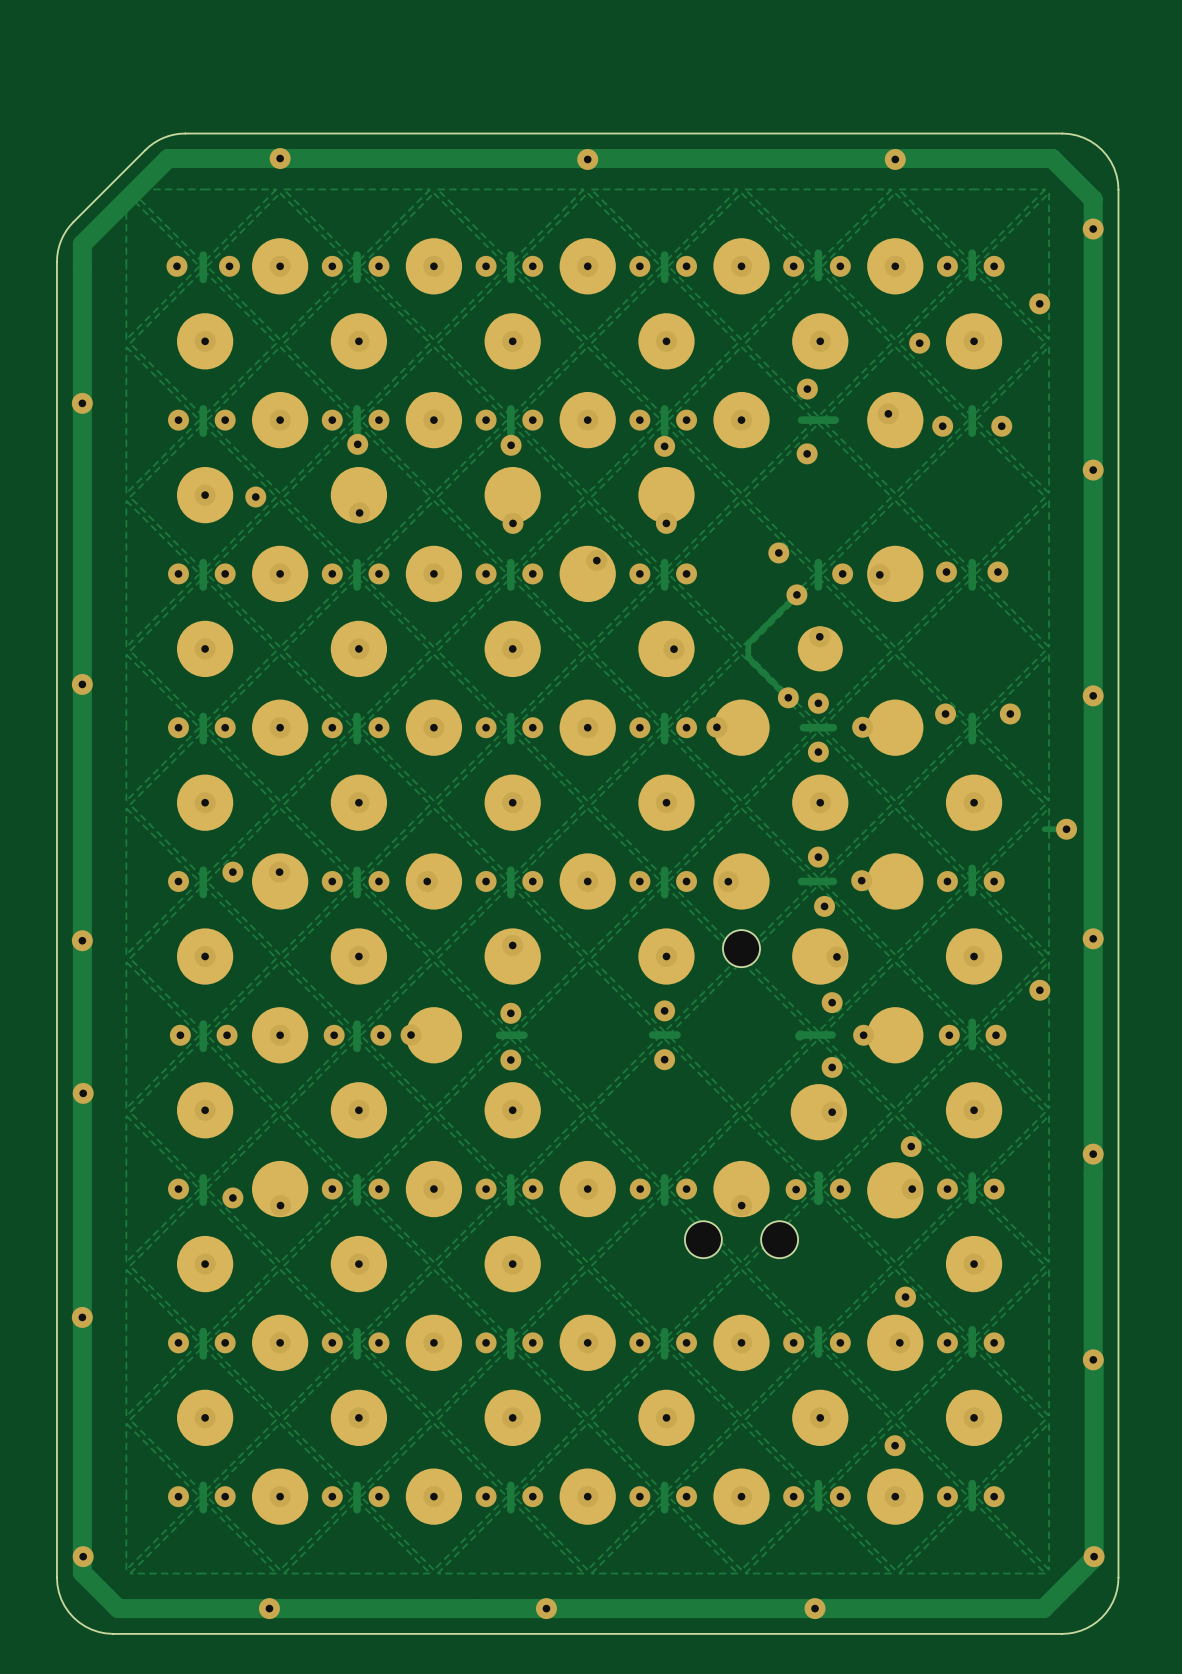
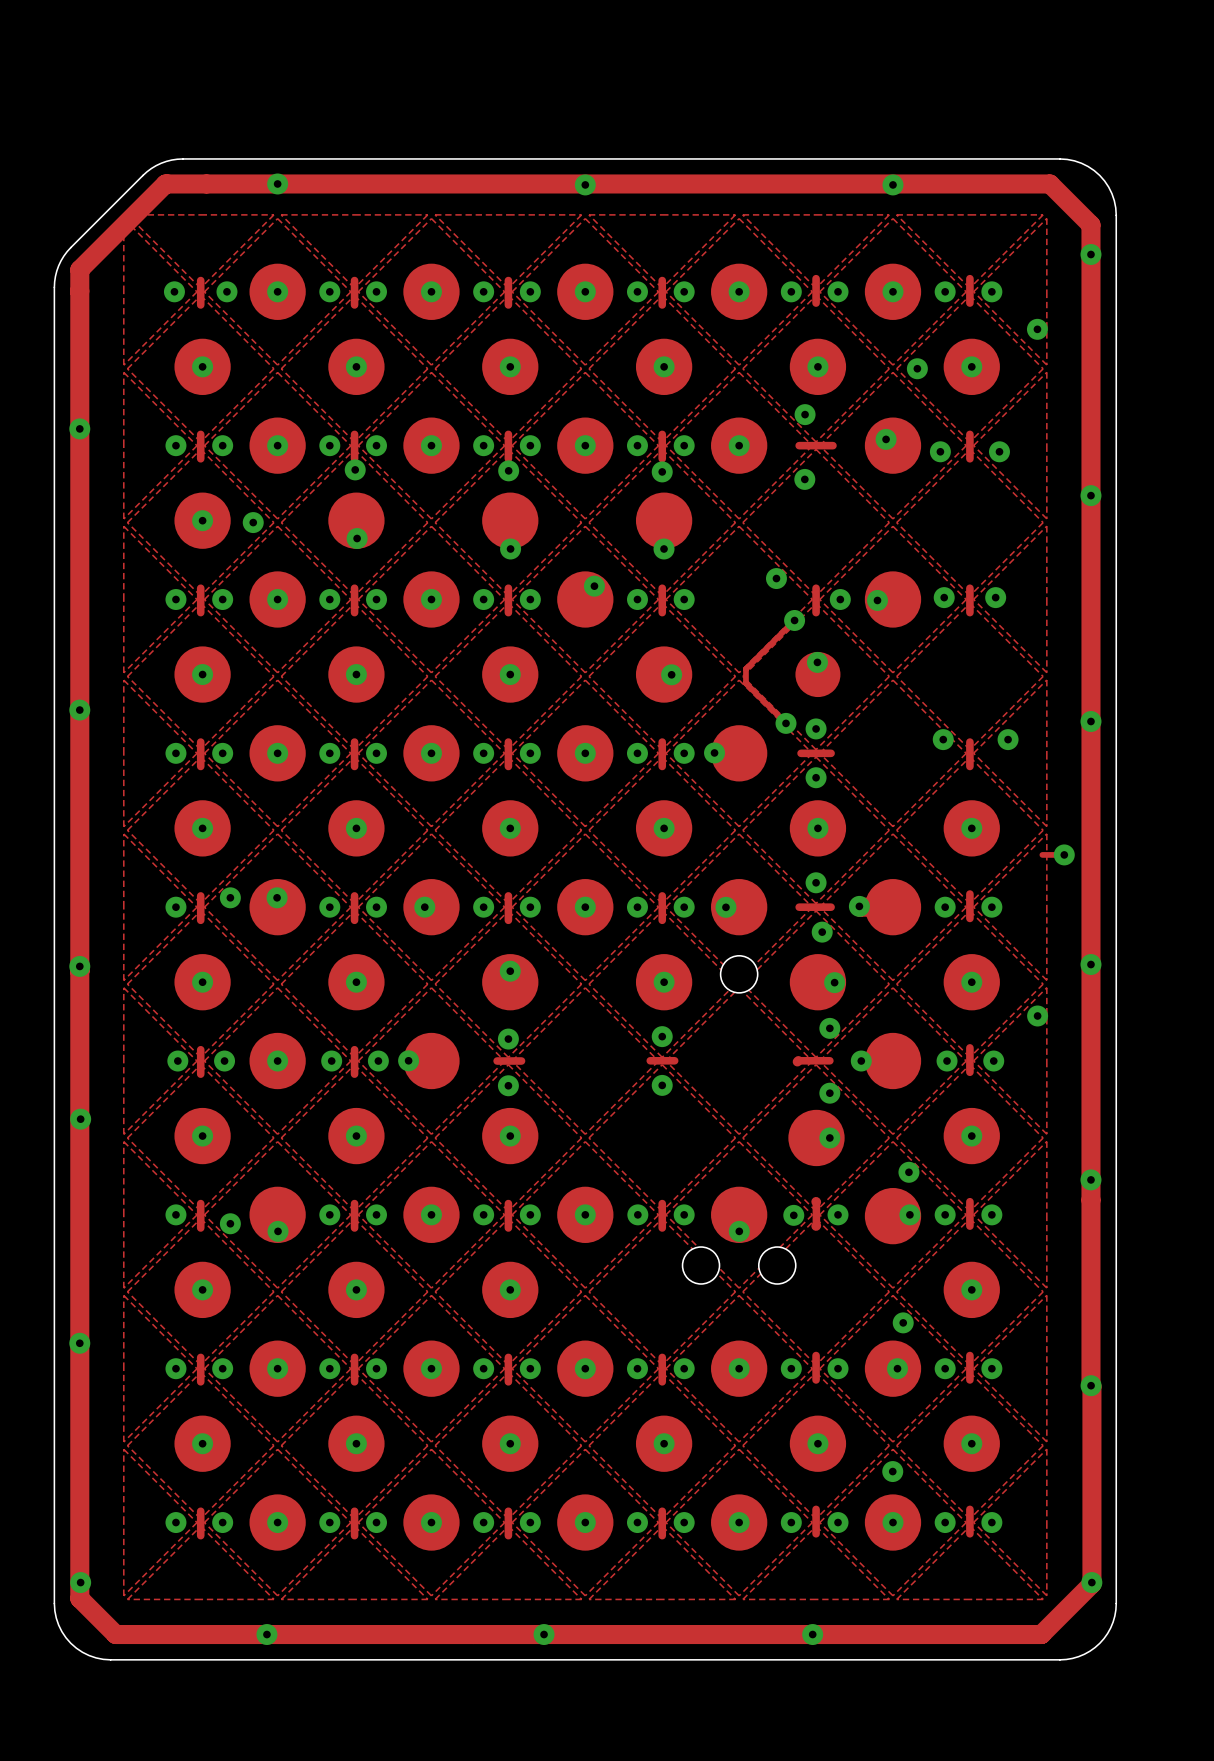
via: (862, 727) -> none
part: (895, 727) -> none

